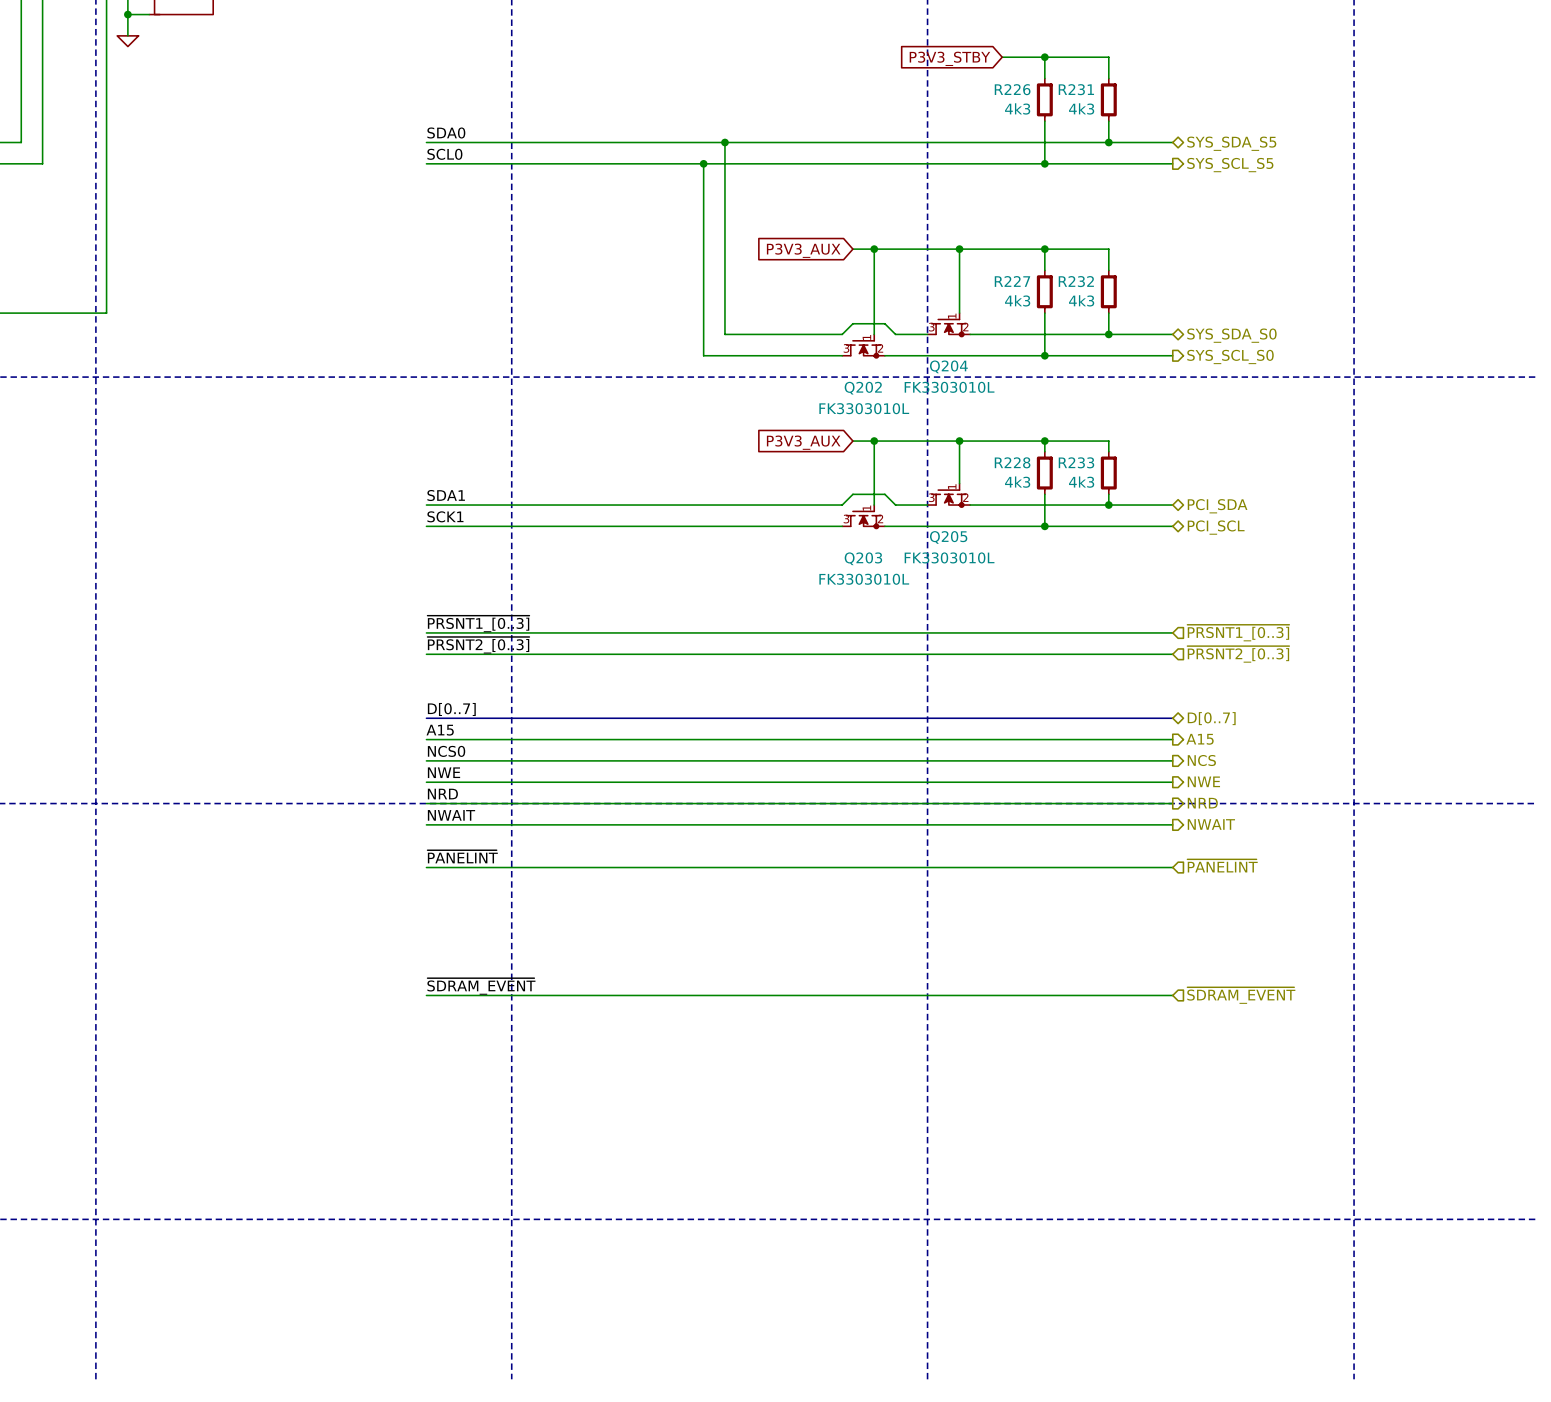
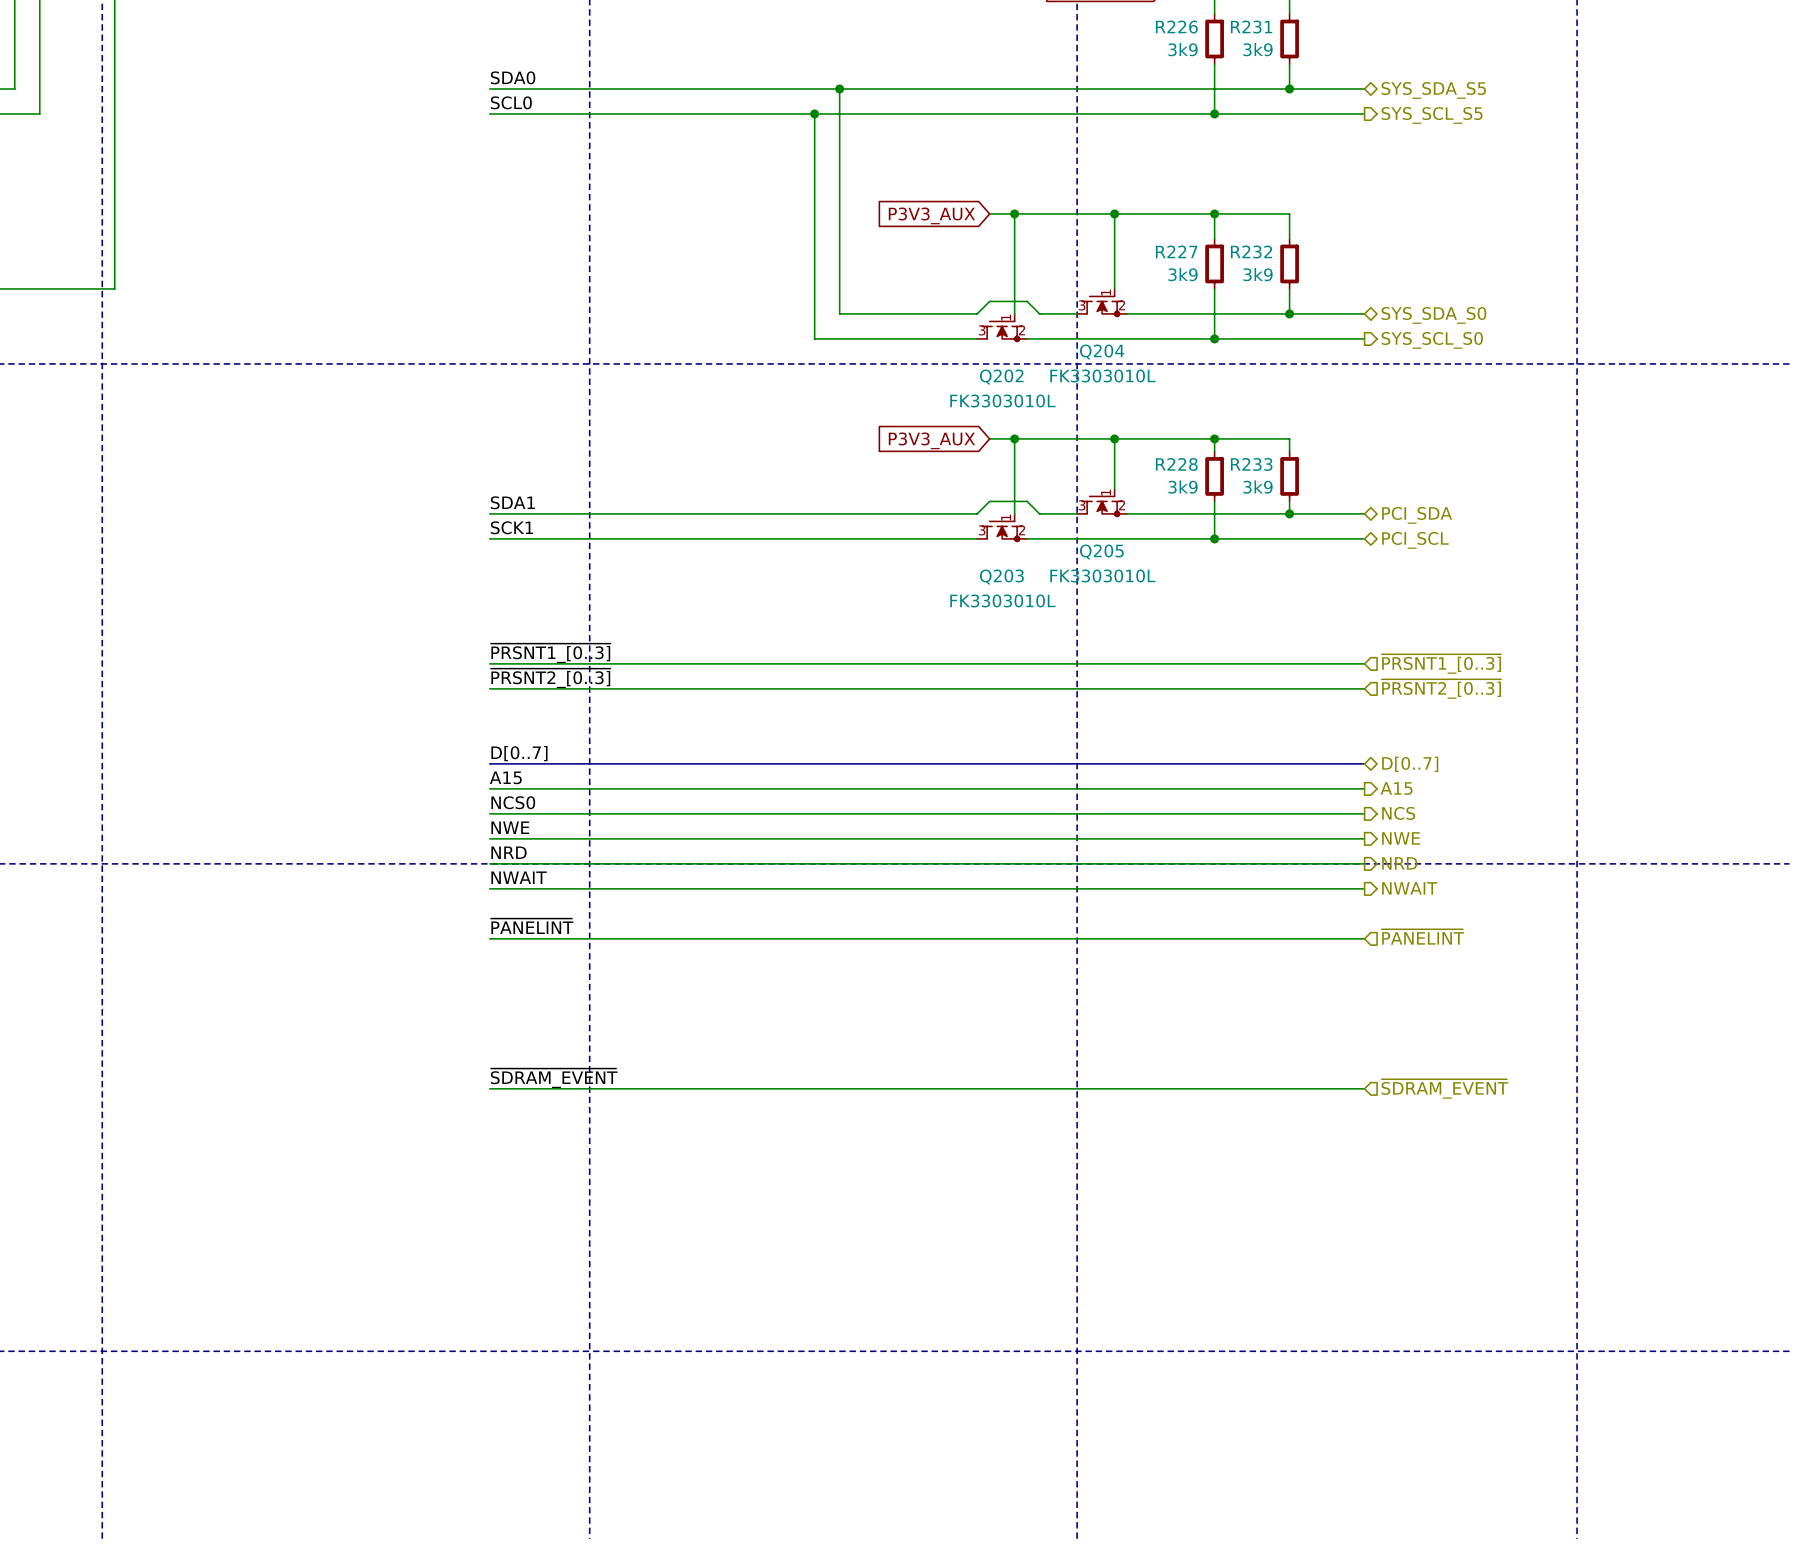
R226 value: 4k3 (1017, 108) -> 3k9 (1183, 49)
R231 value: 4k3 (1081, 108) -> 3k9 (1258, 49)
R227 value: 4k3 (1017, 300) -> 3k9 (1183, 274)
R232 value: 4k3 (1081, 300) -> 3k9 (1258, 274)
R228 value: 4k3 (1017, 482) -> 3k9 (1183, 487)
R233 value: 4k3 (1081, 482) -> 3k9 (1258, 487)

